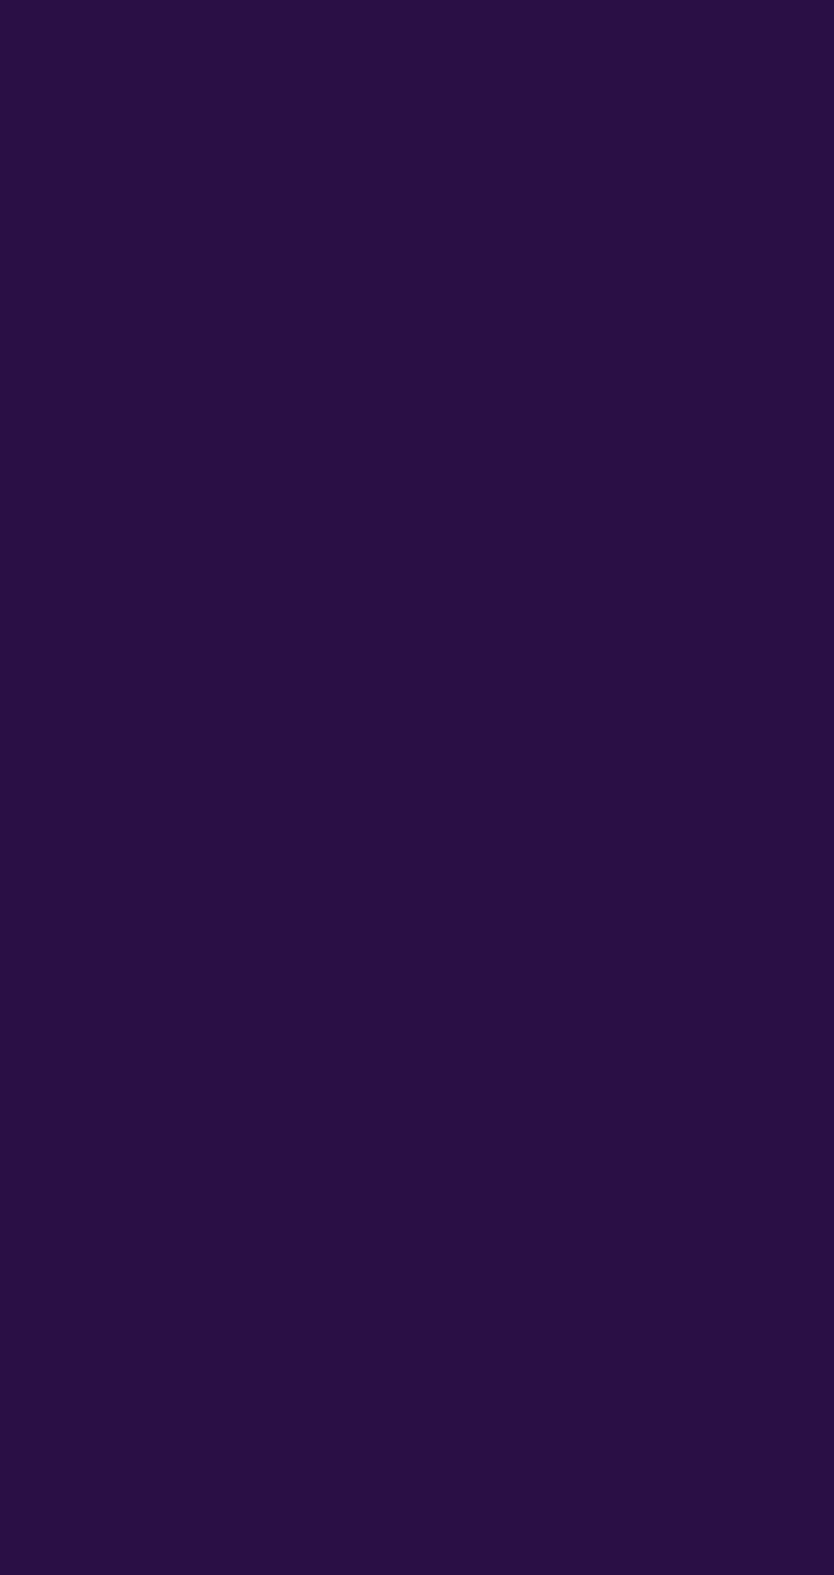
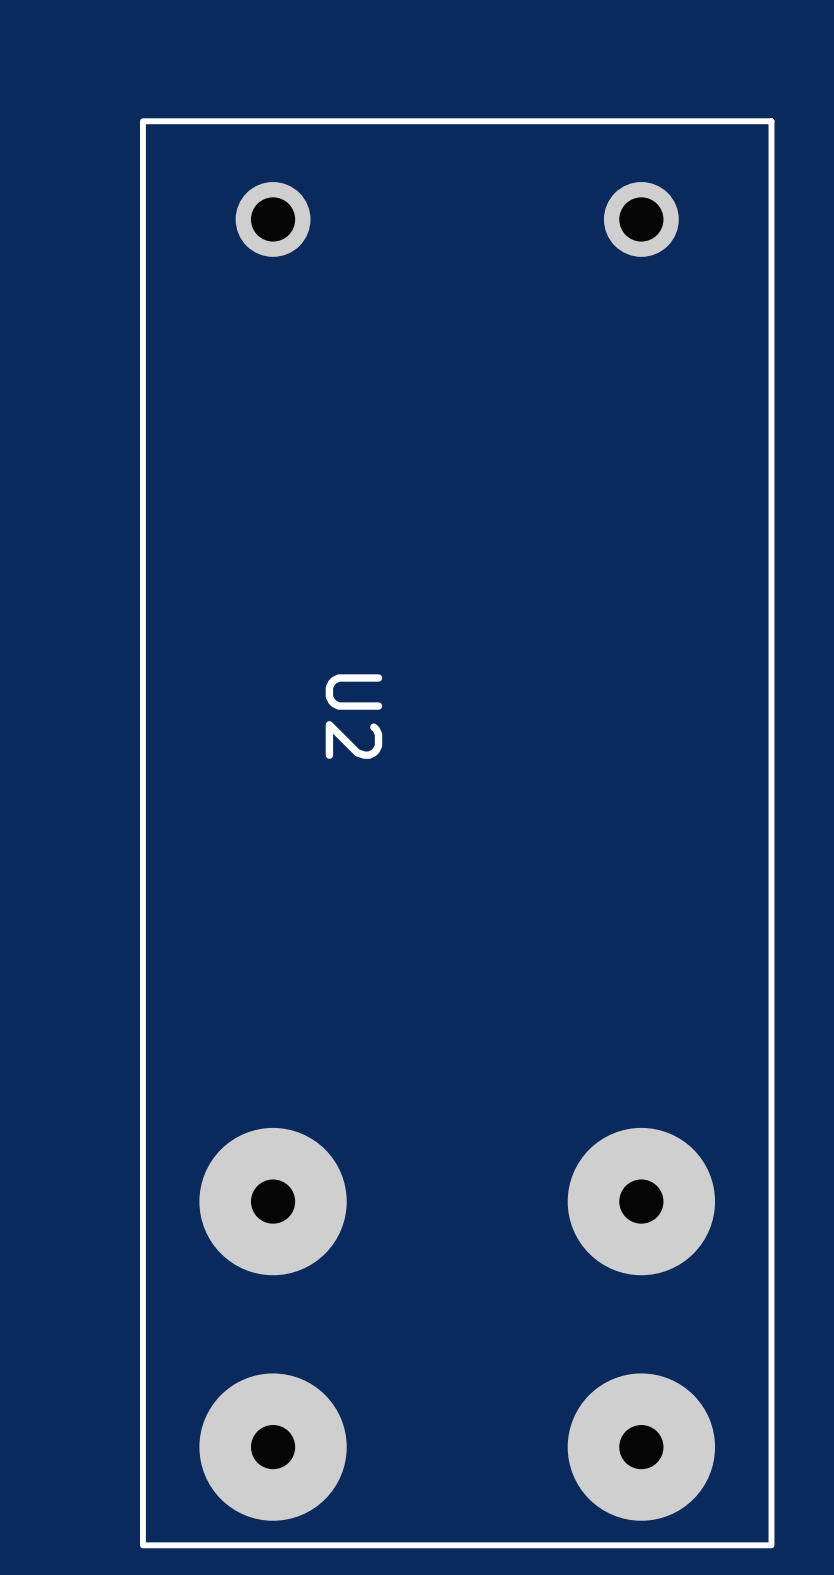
U2: none -> (457, 833)

